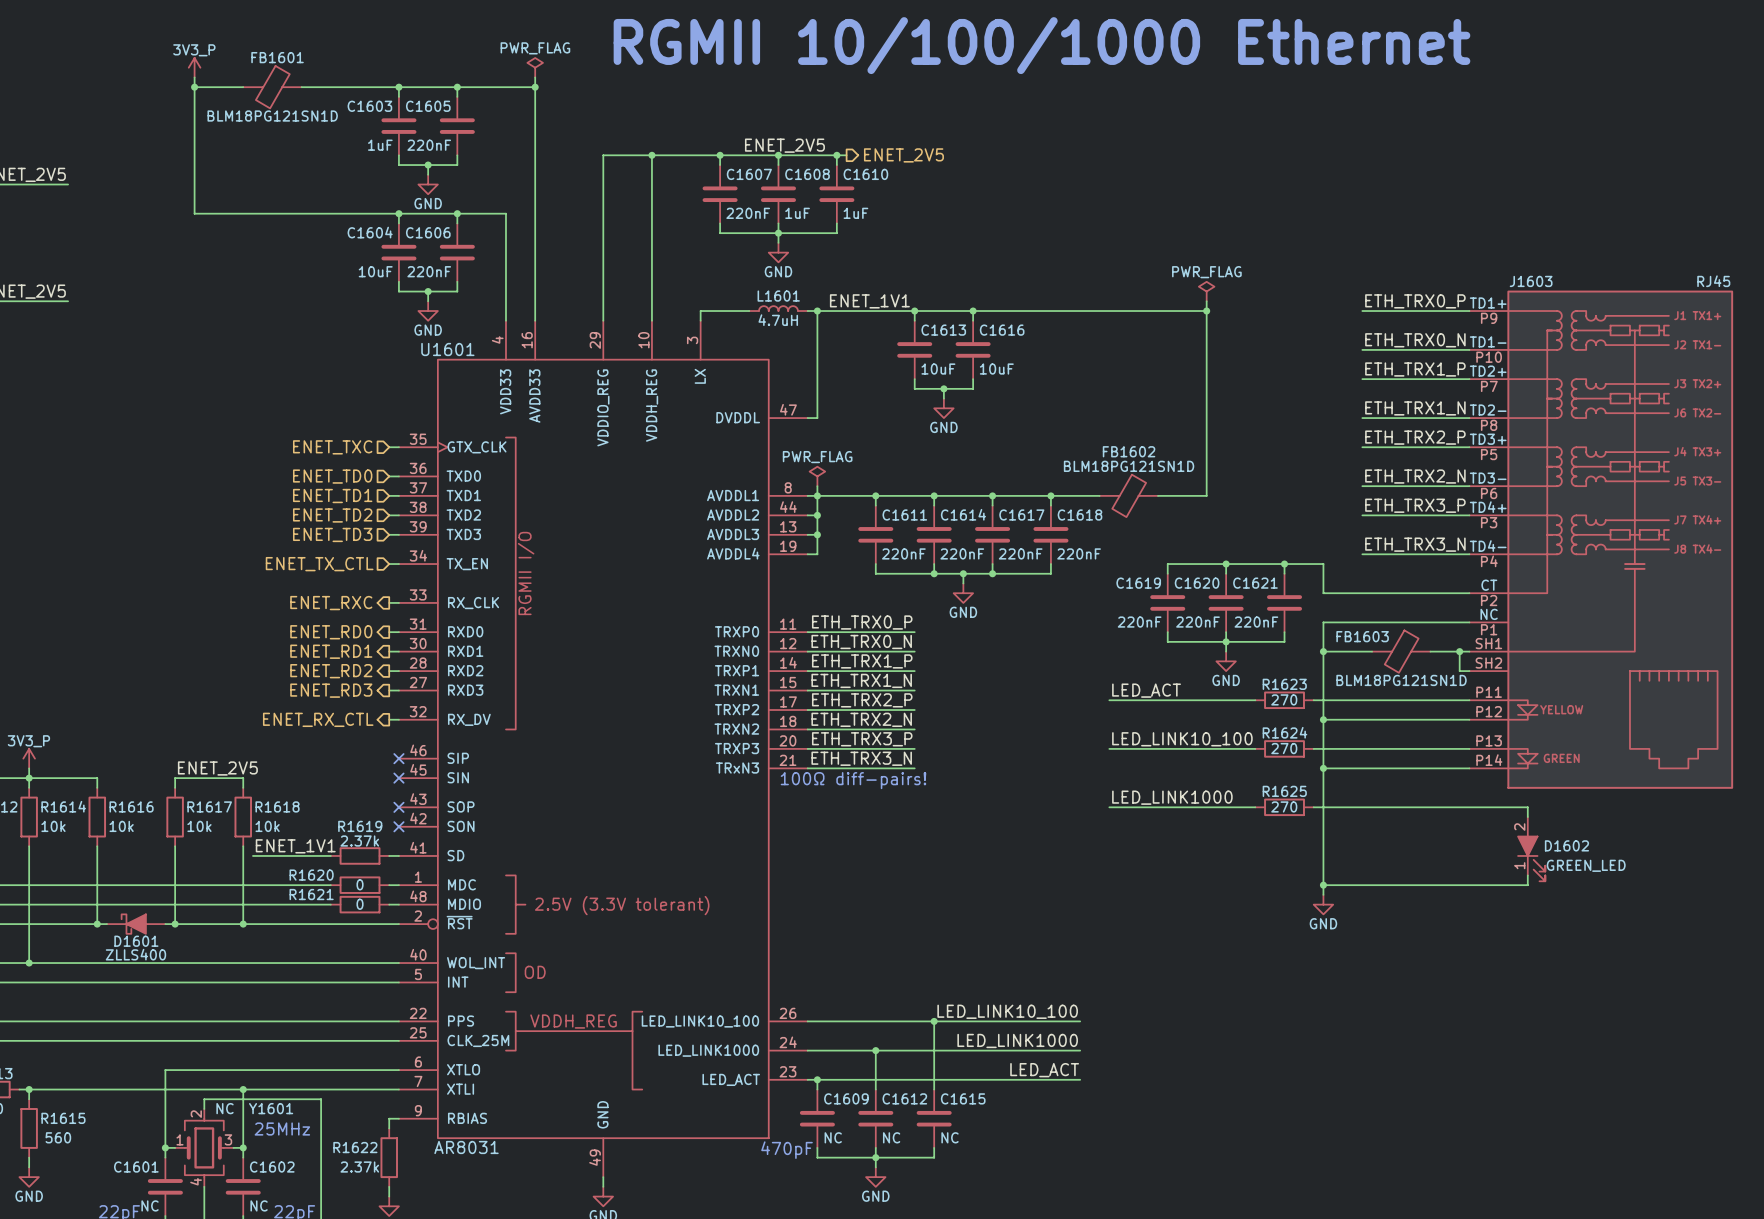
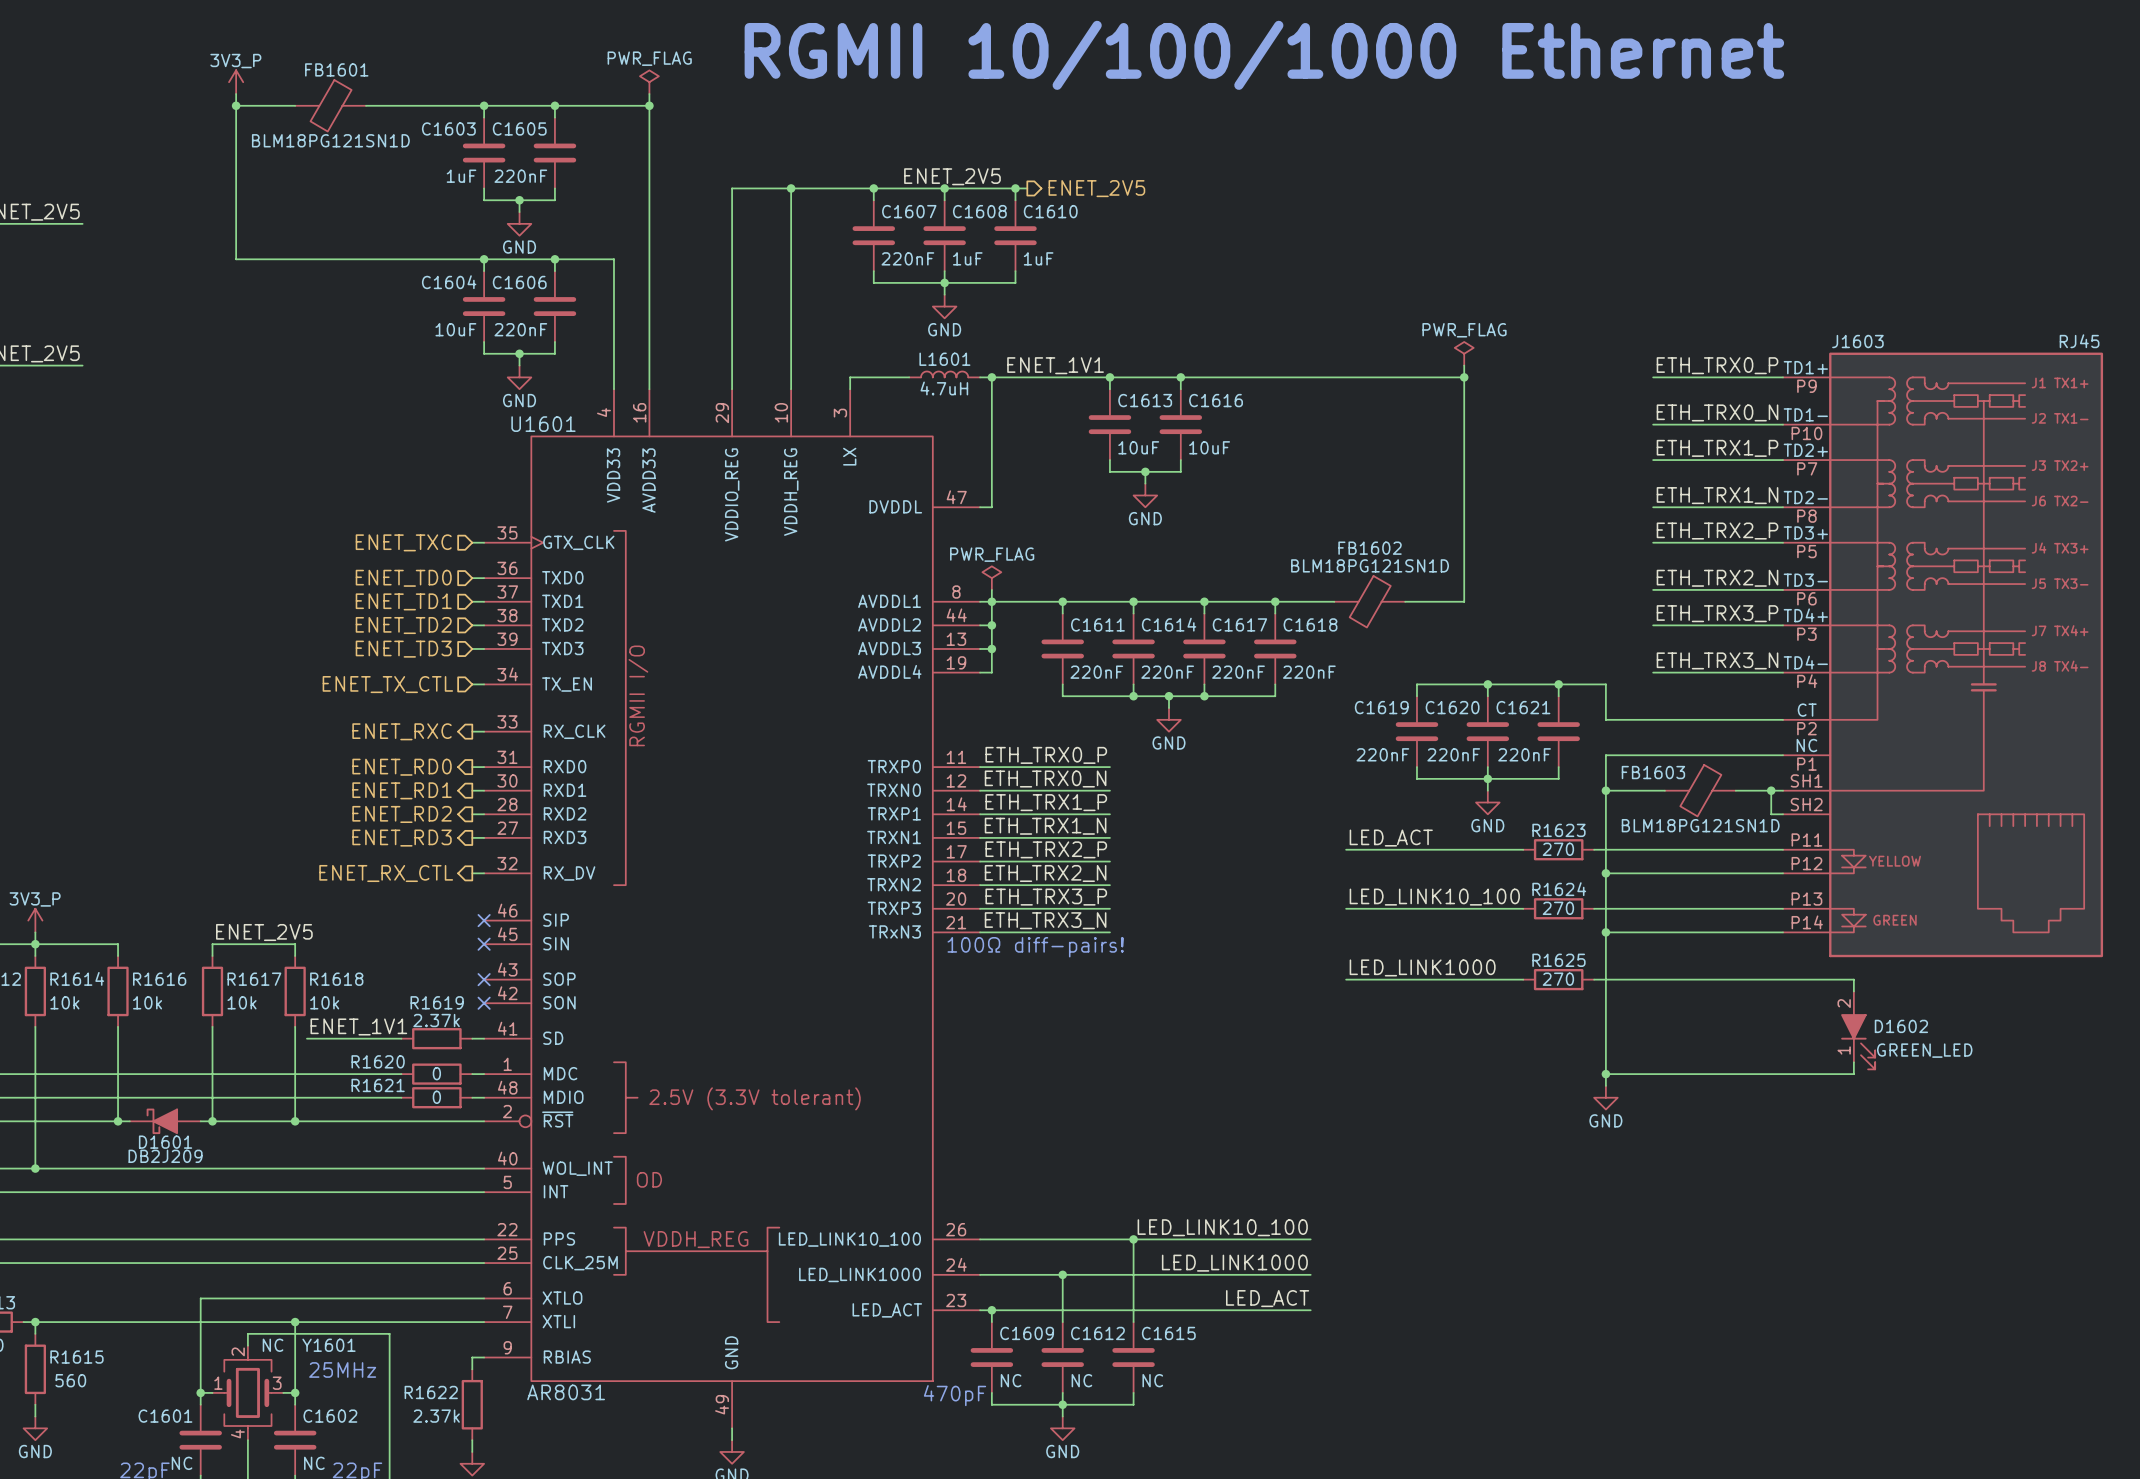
D1601 value: ZLLS400 (135, 954) -> DB2J209 (165, 1156)

